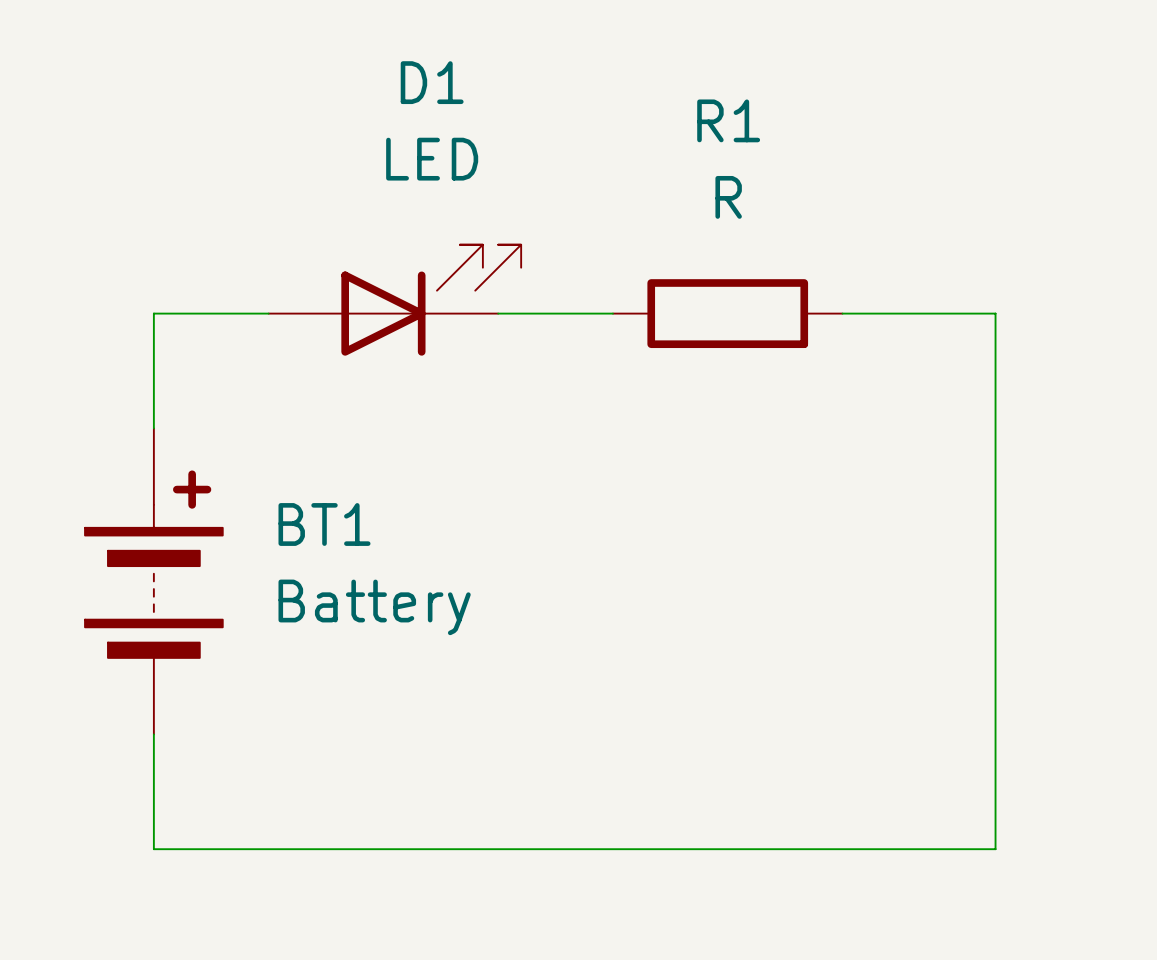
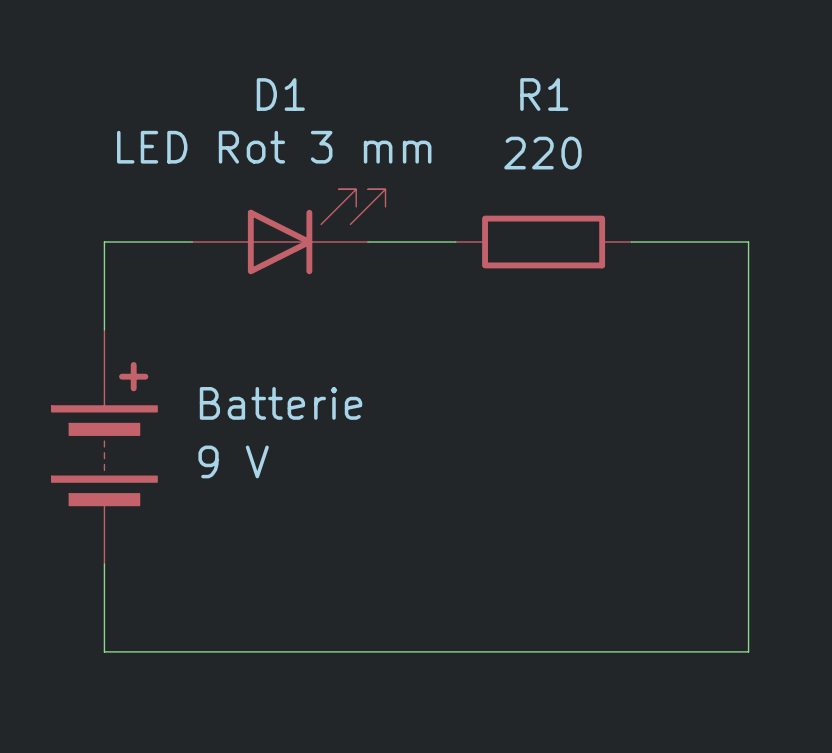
D1 name position: D1 (432, 82) -> D1 (280, 94)
D1 value: LED (432, 159) -> LED Rot 3 mm (274, 147)
R1 value: R (728, 197) -> 220 (542, 153)
BT1 name: BT1 (324, 524) -> Batterie (281, 403)
BT1 value: Battery (374, 607) -> 9 V (233, 461)

